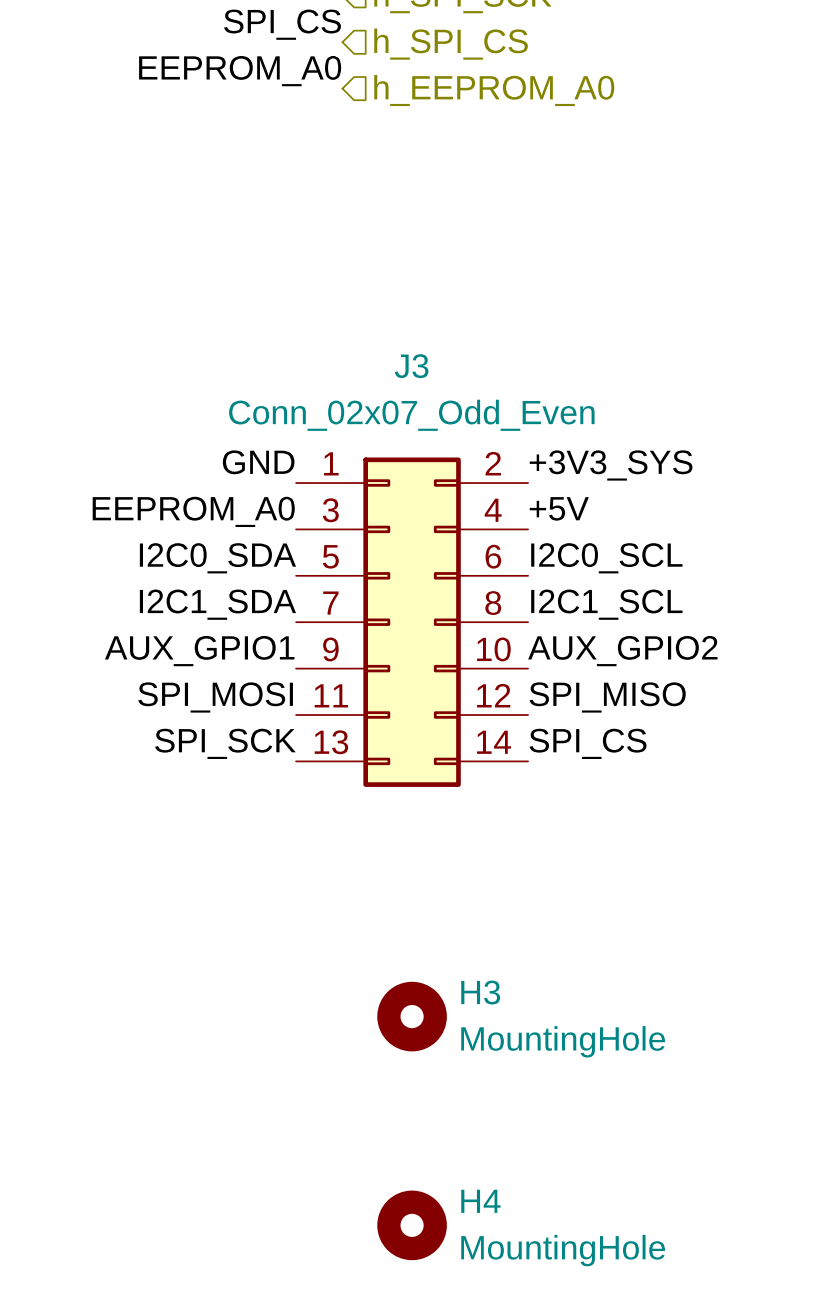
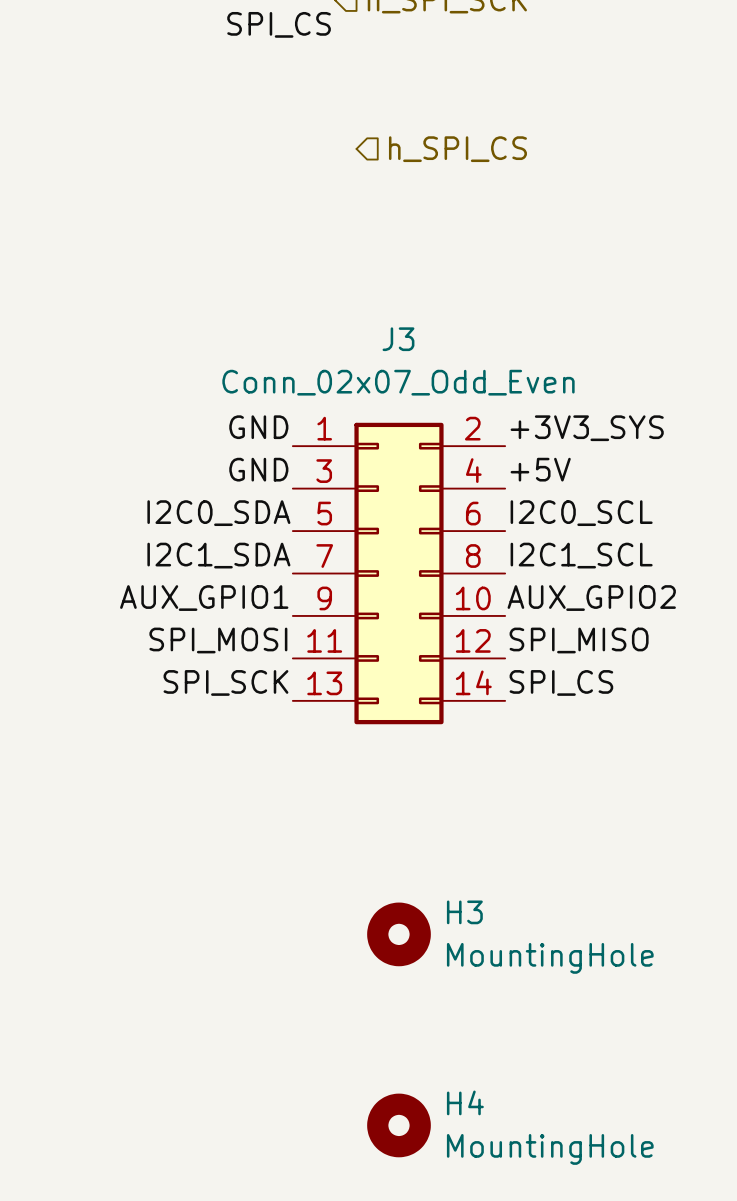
hierarchical label position: h_SPI_CS (451, 44) -> h_SPI_CS (457, 149)
label: EEPROM_A0 (240, 71) -> none
hierarchical label: h_EEPROM_A0 (494, 90) -> none
label: EEPROM_A0 (193, 511) -> GND (258, 469)

